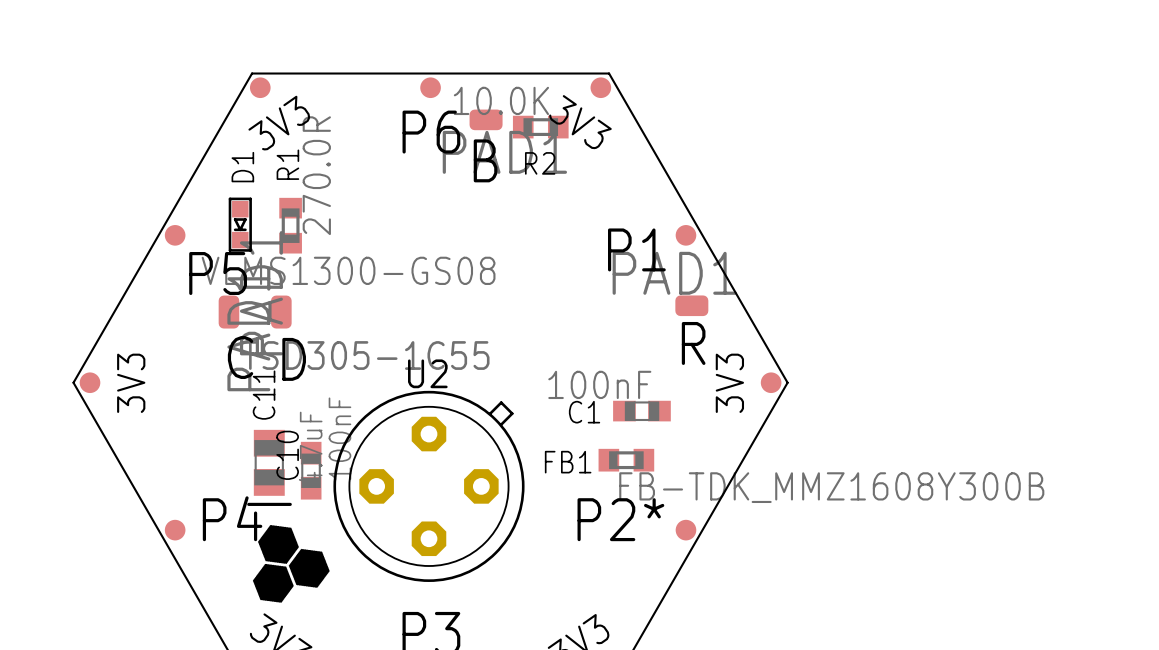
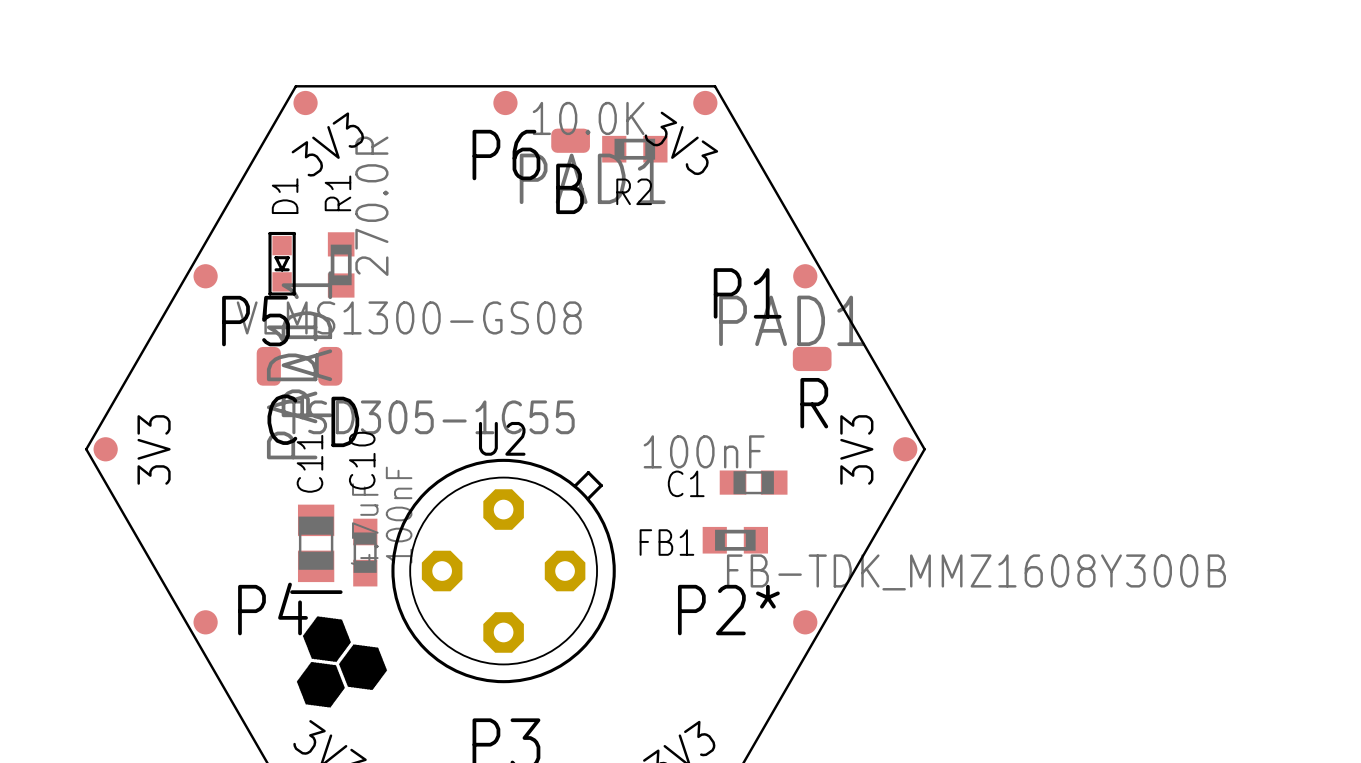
C10 name position: C10 (287, 455) -> C10 (362, 460)

